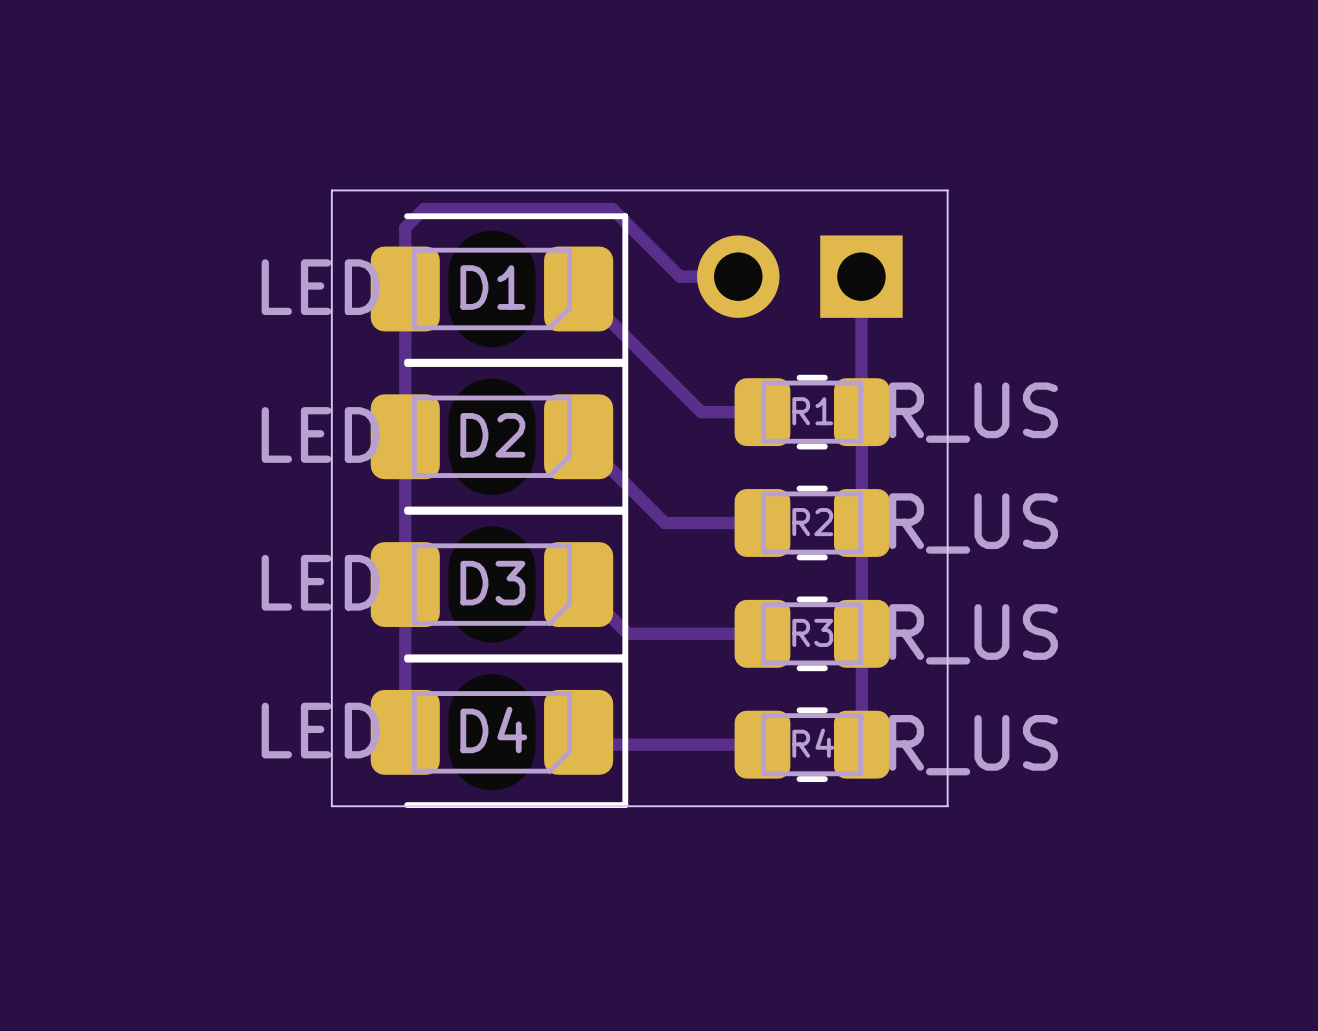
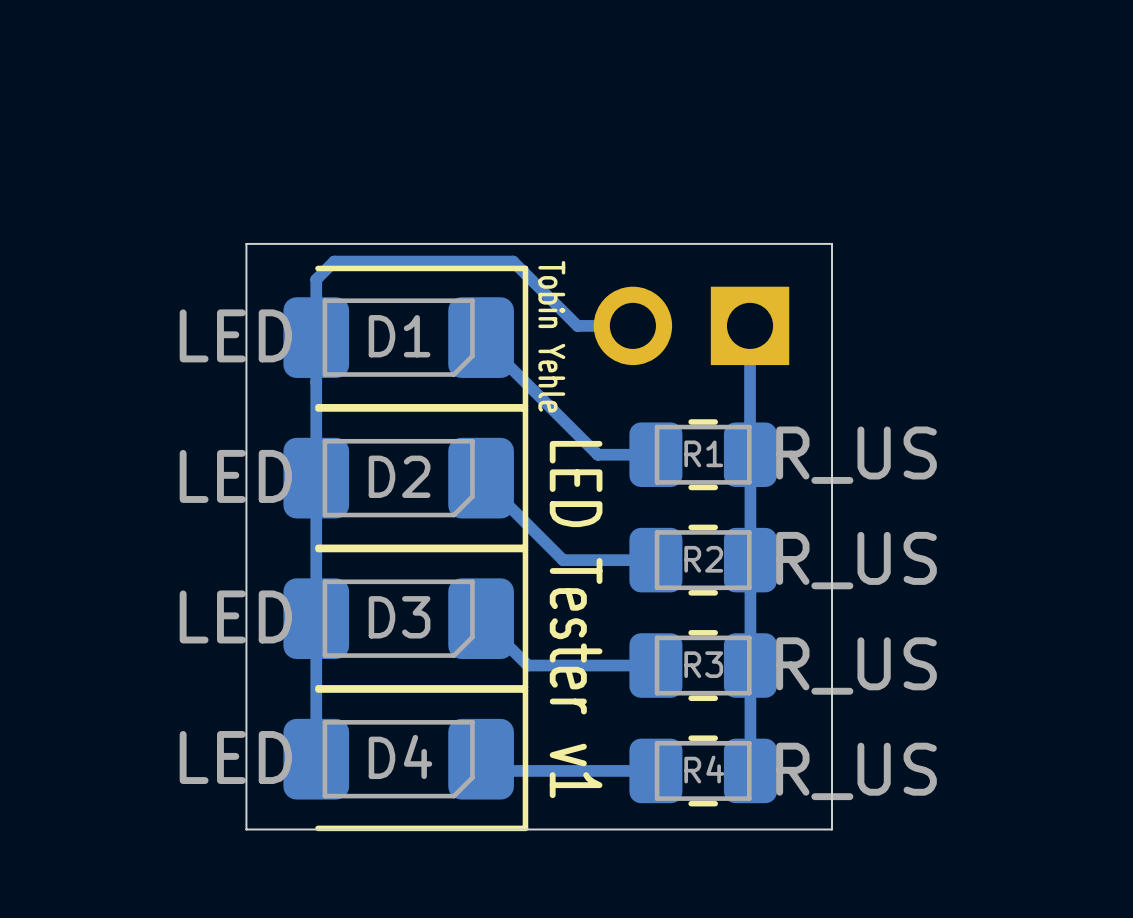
text: none -> Tobin Yehle (551, 336)
text: none -> LED Tester v1 (576, 619)

